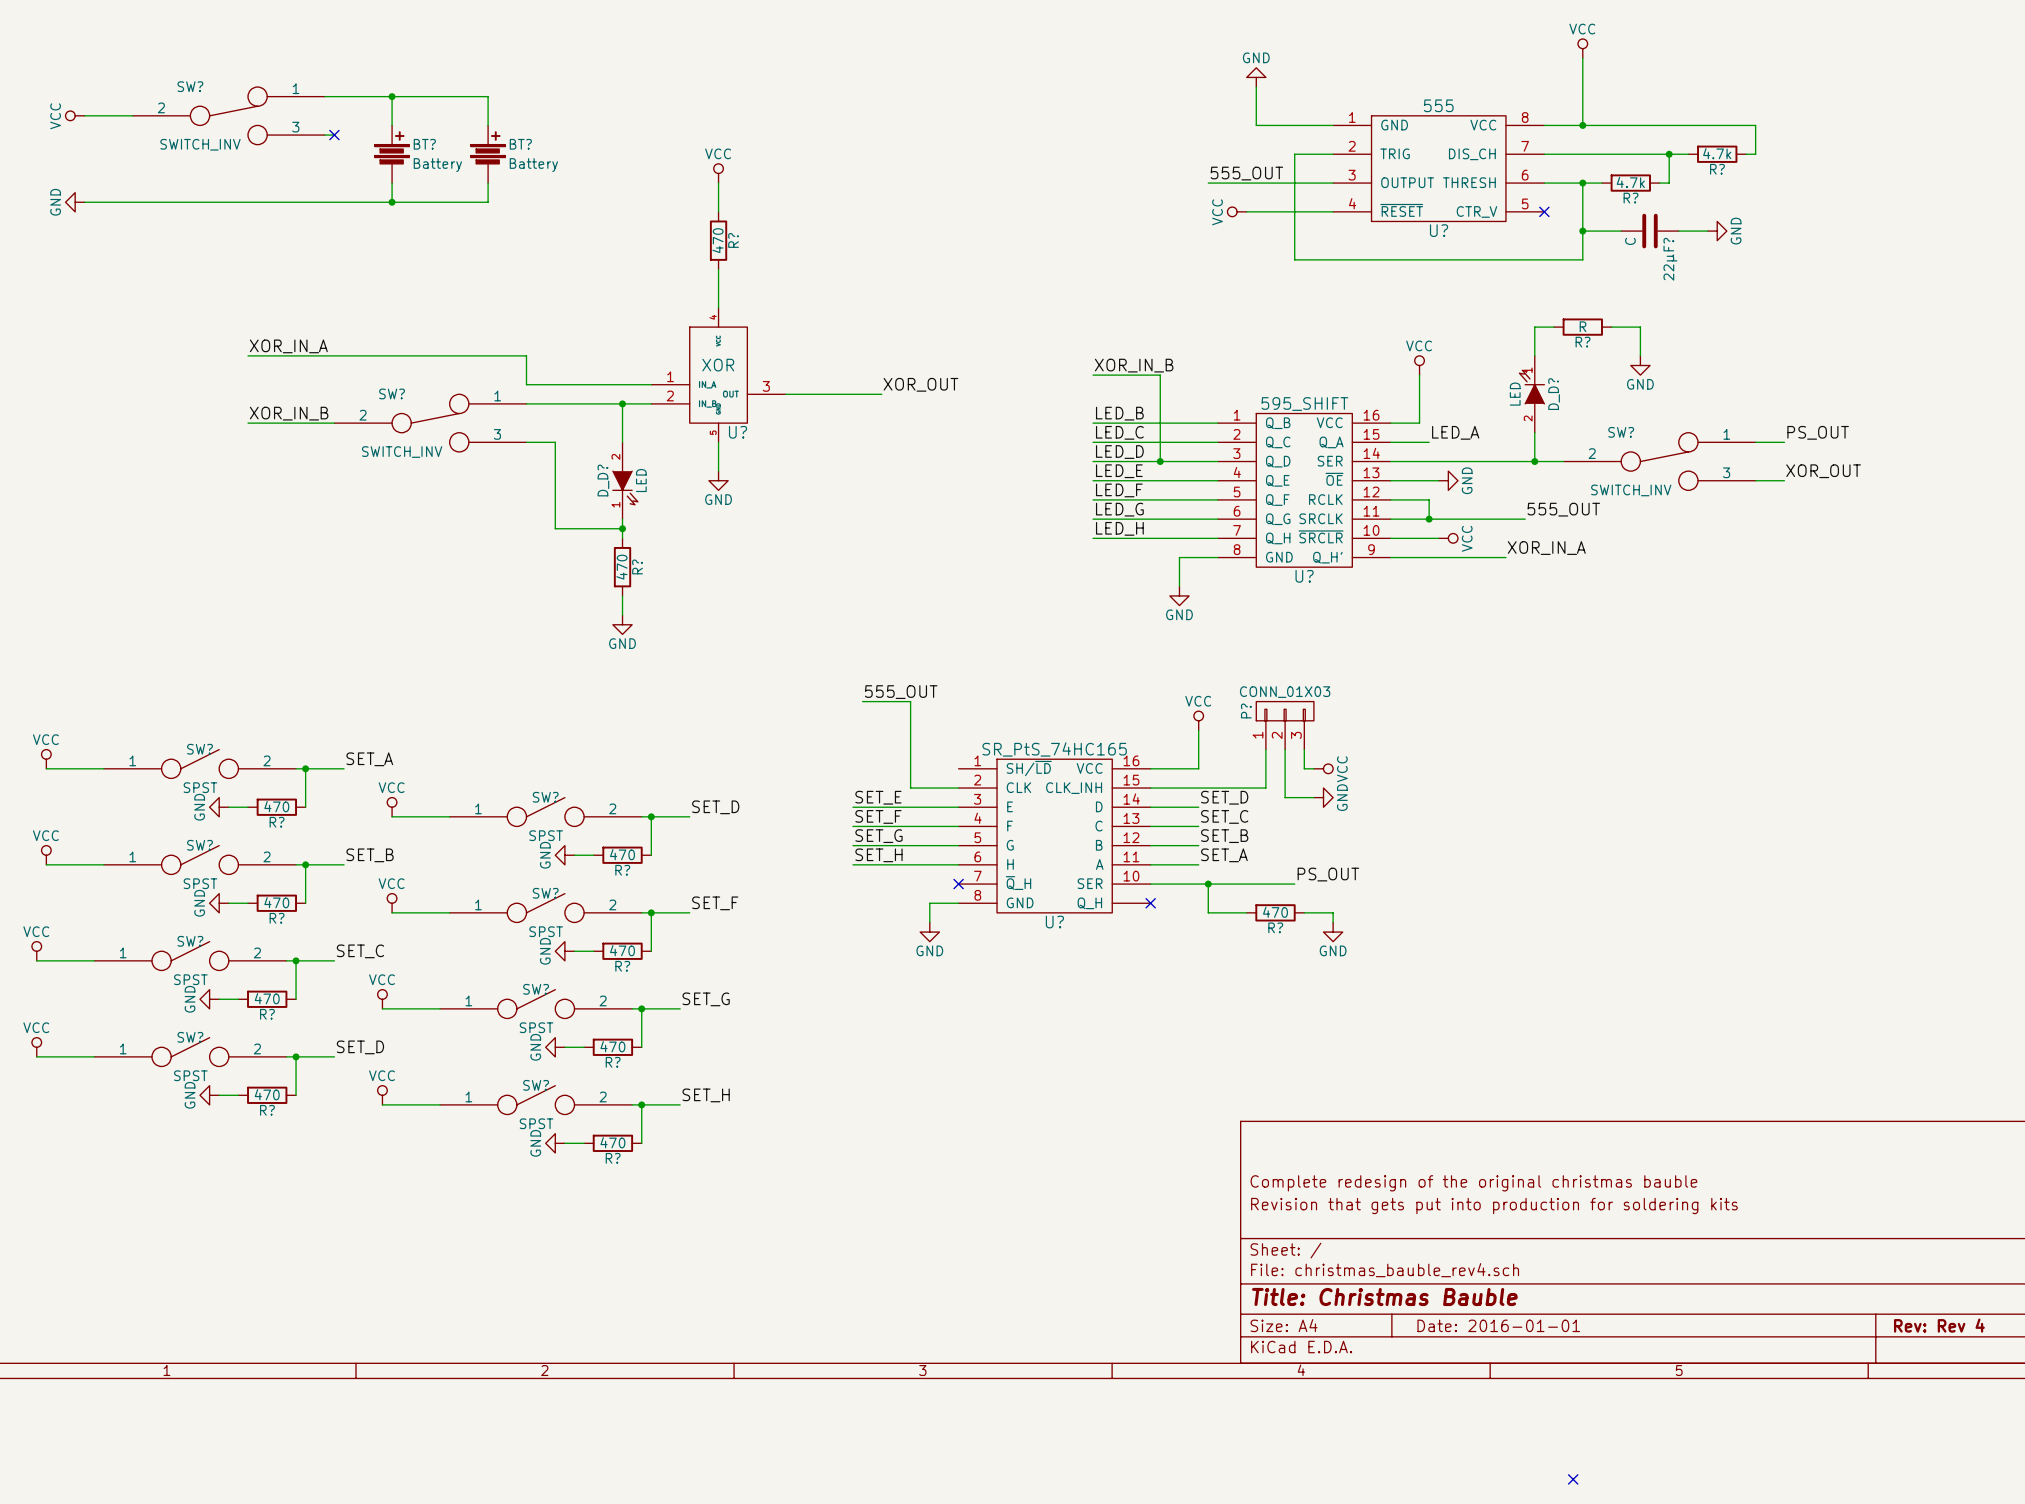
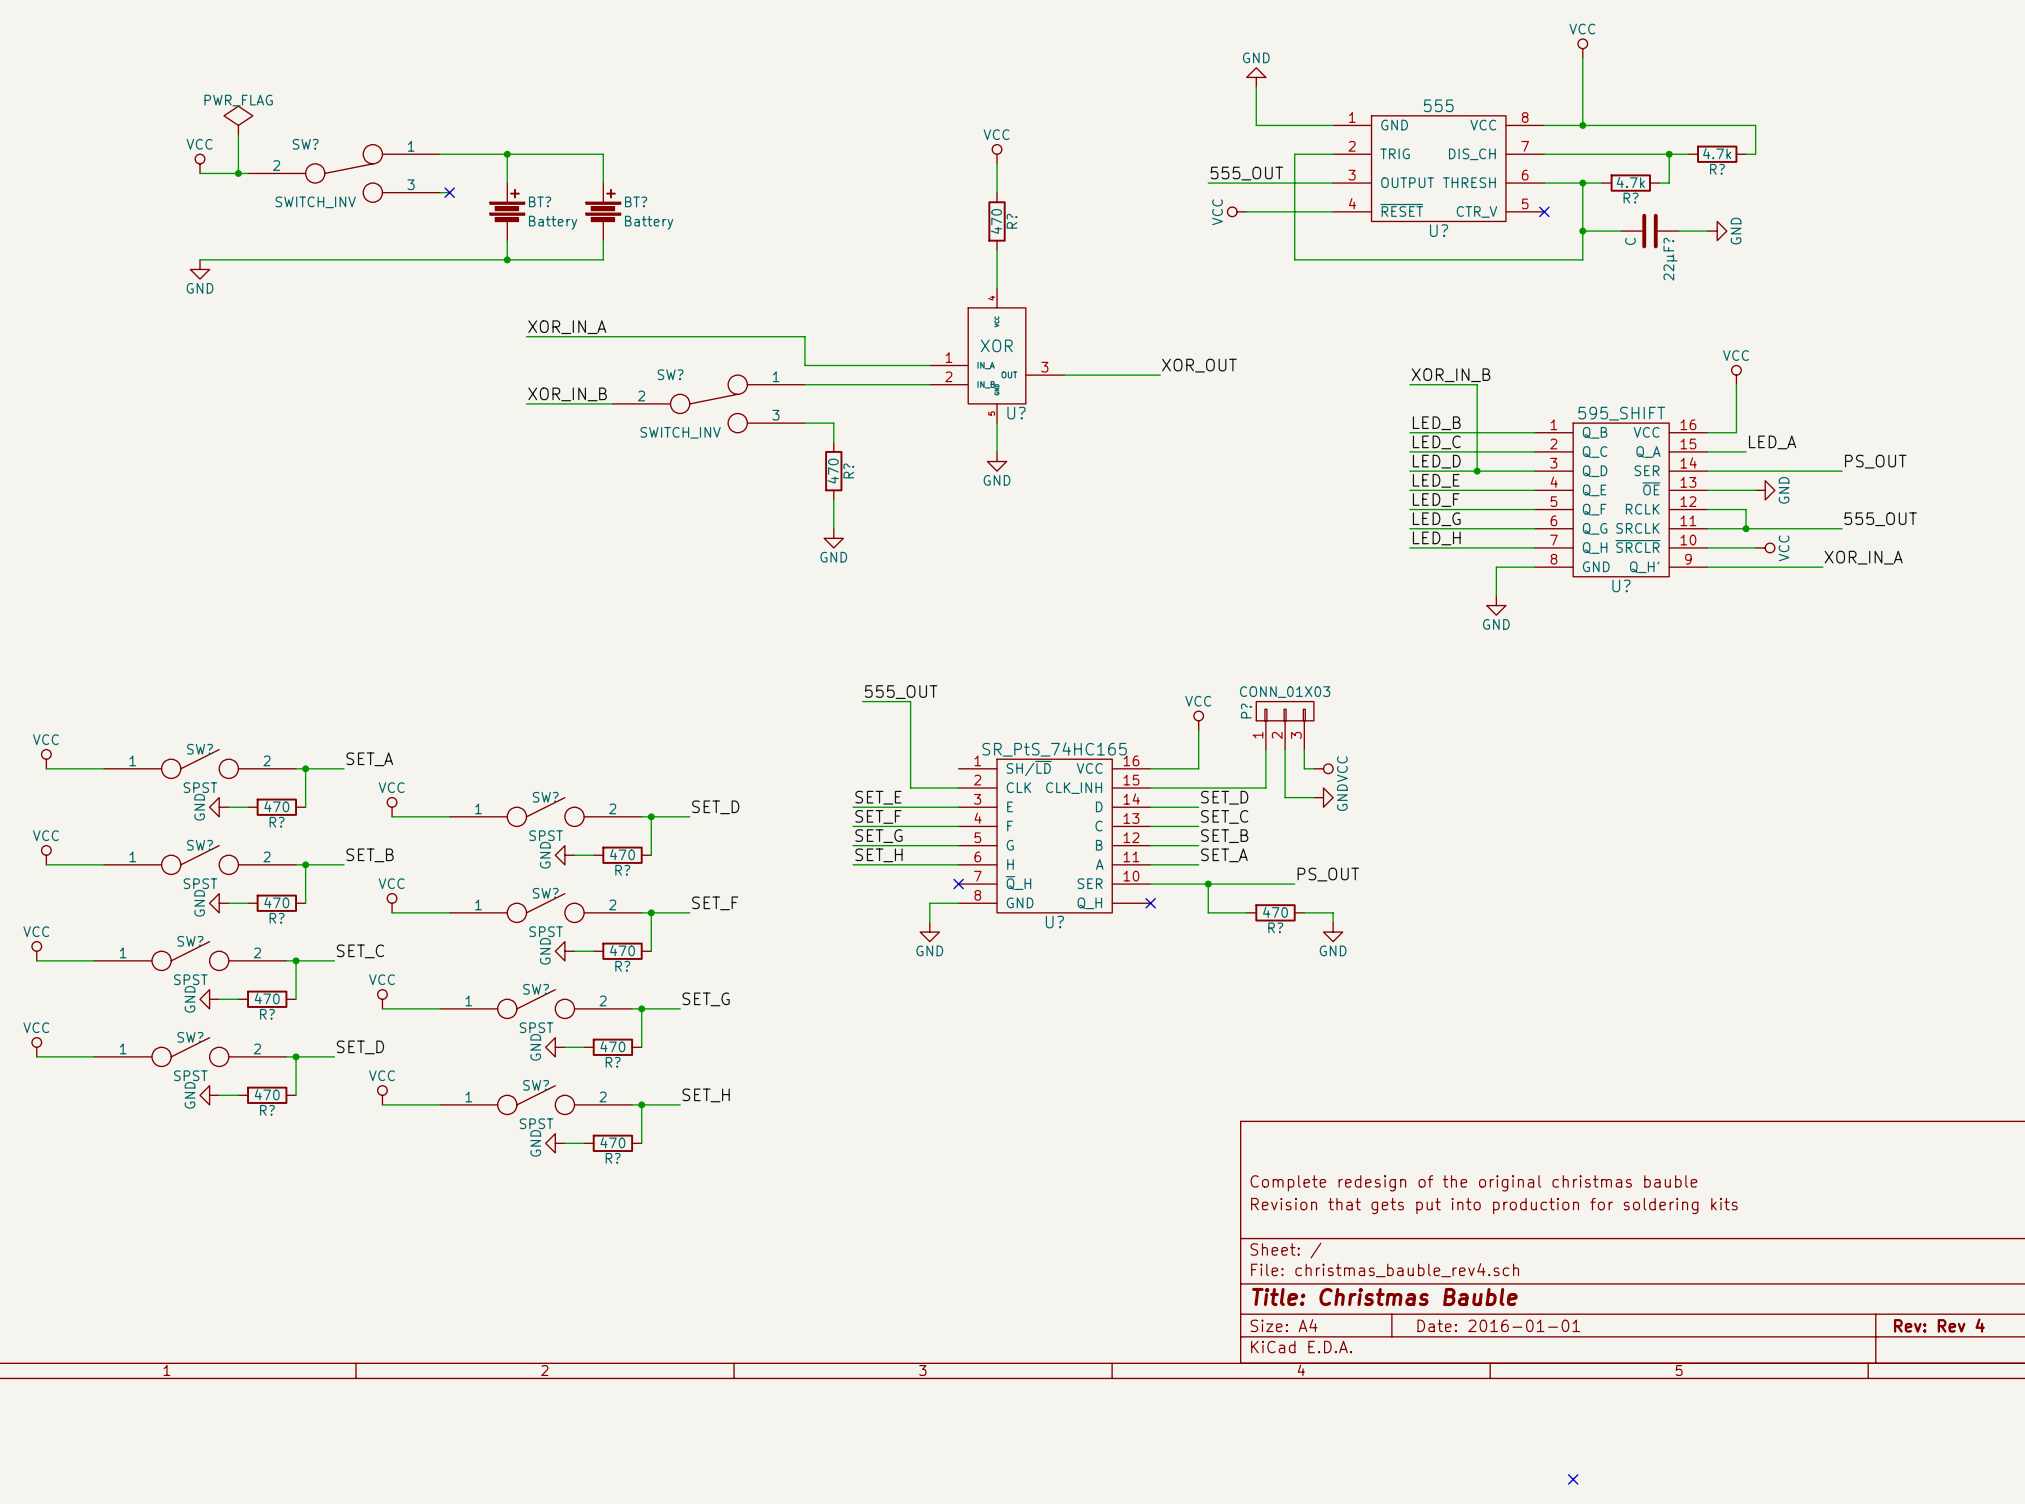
wire: (324, 96) (488, 96) (488, 125) -> (440, 154) (603, 154) (603, 183)
wire: (392, 96) (392, 125) -> (507, 154) (507, 183)
junction: (392, 96) -> none
power symbol rotation: 0° (75, 115) -> 90° clockwise (200, 163)
power symbol position: VCC (75, 115) -> VCC (200, 163)
wire: (84, 115) (132, 115) -> (200, 173) (248, 173)
SW? position: (228, 115) -> (344, 173)
power symbol: none -> PWR_FLAG (238, 120)
wire: none -> (238, 135) (238, 173)
wire: (324, 135) (334, 135) -> (440, 192) (449, 192)
no-connect mark: (334, 135) -> none
BT?: Battery (392, 154) -> none
BT? position: (488, 154) -> (507, 211)
junction: none -> (507, 154)
power symbol: none -> VCC (997, 154)
wire: none -> (997, 163) (997, 192)
junction: none -> (238, 173)
power symbol: VCC (718, 173) -> none
wire: (392, 183) (392, 202) -> (507, 240) (507, 259)
wire: (488, 183) (488, 202) (84, 202) -> (603, 240) (603, 259) (200, 259)
wire: (718, 183) (718, 211) -> none
no-connect mark: none -> (449, 192)
power symbol rotation: 0° (75, 202) -> 90° counterclockwise (200, 269)
power symbol position: GND (75, 202) -> GND (200, 269)
junction: (392, 202) -> none
BT?: none -> Battery (603, 211)
R?: none -> 470 (997, 221)
R?: 470 (718, 240) -> none
wire: none -> (997, 250) (997, 288)
junction: none -> (507, 259)
wire: (718, 269) (718, 307) -> none
label: none -> XOR_IN_A (567, 327)
wire: (1553, 327) (1534, 327) (1534, 355) -> none
R?: R (1582, 327) -> none
wire: (1611, 327) (1640, 327) (1640, 355) -> none
wire: none -> (526, 336) (804, 336) (804, 365) (929, 365)
label: XOR_IN_A (288, 346) -> none
wire: (248, 355) (526, 355) (526, 384) (651, 384) -> none
U?: none -> XOR (997, 355)
label: XOR_IN_B (1134, 365) -> none
label: none -> XOR_OUT (1199, 365)
power symbol: VCC (1419, 365) -> none
power symbol: GND (1640, 365) -> none
U?: XOR (718, 375) -> none
wire: none -> (1064, 375) (1093, 375)
wire: (1160, 375) (1160, 461) -> none
wire: (1419, 375) (1419, 423) (1390, 423) -> none
label: none -> XOR_IN_B (1451, 375)
power symbol: none -> VCC (1736, 375)
wire: none -> (804, 384) (929, 384)
label: XOR_OUT (920, 384) -> none
wire: none -> (1409, 384) (1477, 384) (1477, 471)
wire: none -> (1736, 384) (1736, 432) (1707, 432)
label: none -> XOR_IN_B (567, 394)
wire: (785, 394) (881, 394) -> none
D_D?: LED (1531, 394) -> none
wire: (622, 403) (622, 442) -> none
junction: (622, 403) -> none
SW?: none -> SWITCH_INV (708, 403)
label: XOR_IN_B (289, 413) -> none
label: LED_B (1119, 413) -> none
wire: (248, 423) (334, 423) -> none
SW?: SWITCH_INV (430, 423) -> none
wire: none -> (804, 423) (833, 423) (833, 442)
wire: none -> (997, 423) (997, 451)
wire: (1093, 423) (1217, 423) -> none
label: none -> LED_B (1436, 423)
label: LED_C (1119, 432) -> none
label: LED_A (1455, 432) -> none
wire: (1534, 432) (1534, 461) -> (1534, 432) (1409, 432)
label position: PS_OUT (1818, 432) -> PS_OUT (1875, 461)
wire: (526, 442) (555, 442) (555, 528) (622, 528) -> none
wire: (718, 442) (718, 471) -> (833, 499) (833, 528)
wire: (1093, 442) (1217, 442) -> none
wire: (1390, 442) (1429, 442) -> none
label: none -> LED_C (1436, 442)
wire: (1755, 442) (1784, 442) -> none
label: none -> LED_A (1772, 442)
wire: none -> (1409, 451) (1534, 451)
wire: none -> (1707, 451) (1746, 451)
label: LED_D (1119, 452) -> none
power symbol: none -> GND (997, 461)
wire: (1093, 461) (1217, 461) -> none
junction: (1160, 461) -> none
wire: (1390, 461) (1563, 461) -> none
label: none -> LED_D (1436, 461)
junction: (1534, 461) -> none
SW?: SWITCH_INV (1659, 461) -> none
R?: none -> 470 (833, 471)
label: LED_E (1119, 471) -> none
wire: none -> (1409, 471) (1534, 471)
junction: none -> (1477, 471)
wire: none -> (1707, 471) (1842, 471)
label: XOR_OUT (1823, 471) -> none
D_D?: LED (625, 480) -> none
power symbol: GND (718, 480) -> none
wire: (1093, 480) (1217, 480) -> none
wire: (1390, 480) (1438, 480) -> none
label: none -> LED_E (1436, 480)
power symbol rotation: 0° (1448, 480) -> 90° clockwise (1496, 605)
power symbol position: GND (1448, 480) -> GND (1496, 605)
wire: (1755, 480) (1784, 480) -> none
label: LED_F (1119, 490) -> none
U?: 595_SHIFT (1304, 490) -> none
wire: none -> (1409, 490) (1534, 490)
wire: none -> (1707, 490) (1755, 490)
power symbol: none -> GND (1765, 490)
wire: (1093, 499) (1217, 499) -> none
wire: (1390, 499) (1429, 499) (1429, 519) -> none
U?: none -> 595_SHIFT (1621, 499)
label: none -> LED_F (1436, 500)
label: LED_G (1119, 509) -> none
wire: none -> (1409, 509) (1534, 509)
label: 555_OUT (1563, 509) -> none
wire: none -> (1707, 509) (1746, 509) (1746, 528)
wire: (622, 519) (622, 538) -> none
wire: (1093, 519) (1217, 519) -> none
wire: (1390, 519) (1525, 519) -> none
junction: (1429, 519) -> none
label: none -> LED_G (1436, 519)
label: none -> 555_OUT (1880, 519)
junction: (622, 528) -> none
label: LED_H (1119, 528) -> none
wire: none -> (1409, 528) (1534, 528)
wire: none -> (1707, 528) (1842, 528)
junction: none -> (1746, 528)
power symbol: none -> GND (833, 538)
wire: (1093, 538) (1217, 538) -> none
wire: (1390, 538) (1438, 538) -> none
label: none -> LED_H (1436, 538)
power symbol: VCC (1448, 538) -> none
wire: none -> (1409, 547) (1534, 547)
wire: none -> (1707, 547) (1755, 547)
power symbol: none -> VCC (1765, 547)
label: XOR_IN_A (1546, 548) -> none
wire: (1217, 557) (1179, 557) (1179, 586) -> none
wire: (1390, 557) (1505, 557) -> none
label: none -> XOR_IN_A (1863, 557)
R?: 470 (622, 567) -> none
wire: none -> (1534, 567) (1496, 567) (1496, 595)
wire: none -> (1707, 567) (1822, 567)
wire: (622, 595) (622, 615) -> none
power symbol: GND (1179, 595) -> none
power symbol: GND (622, 624) -> none

